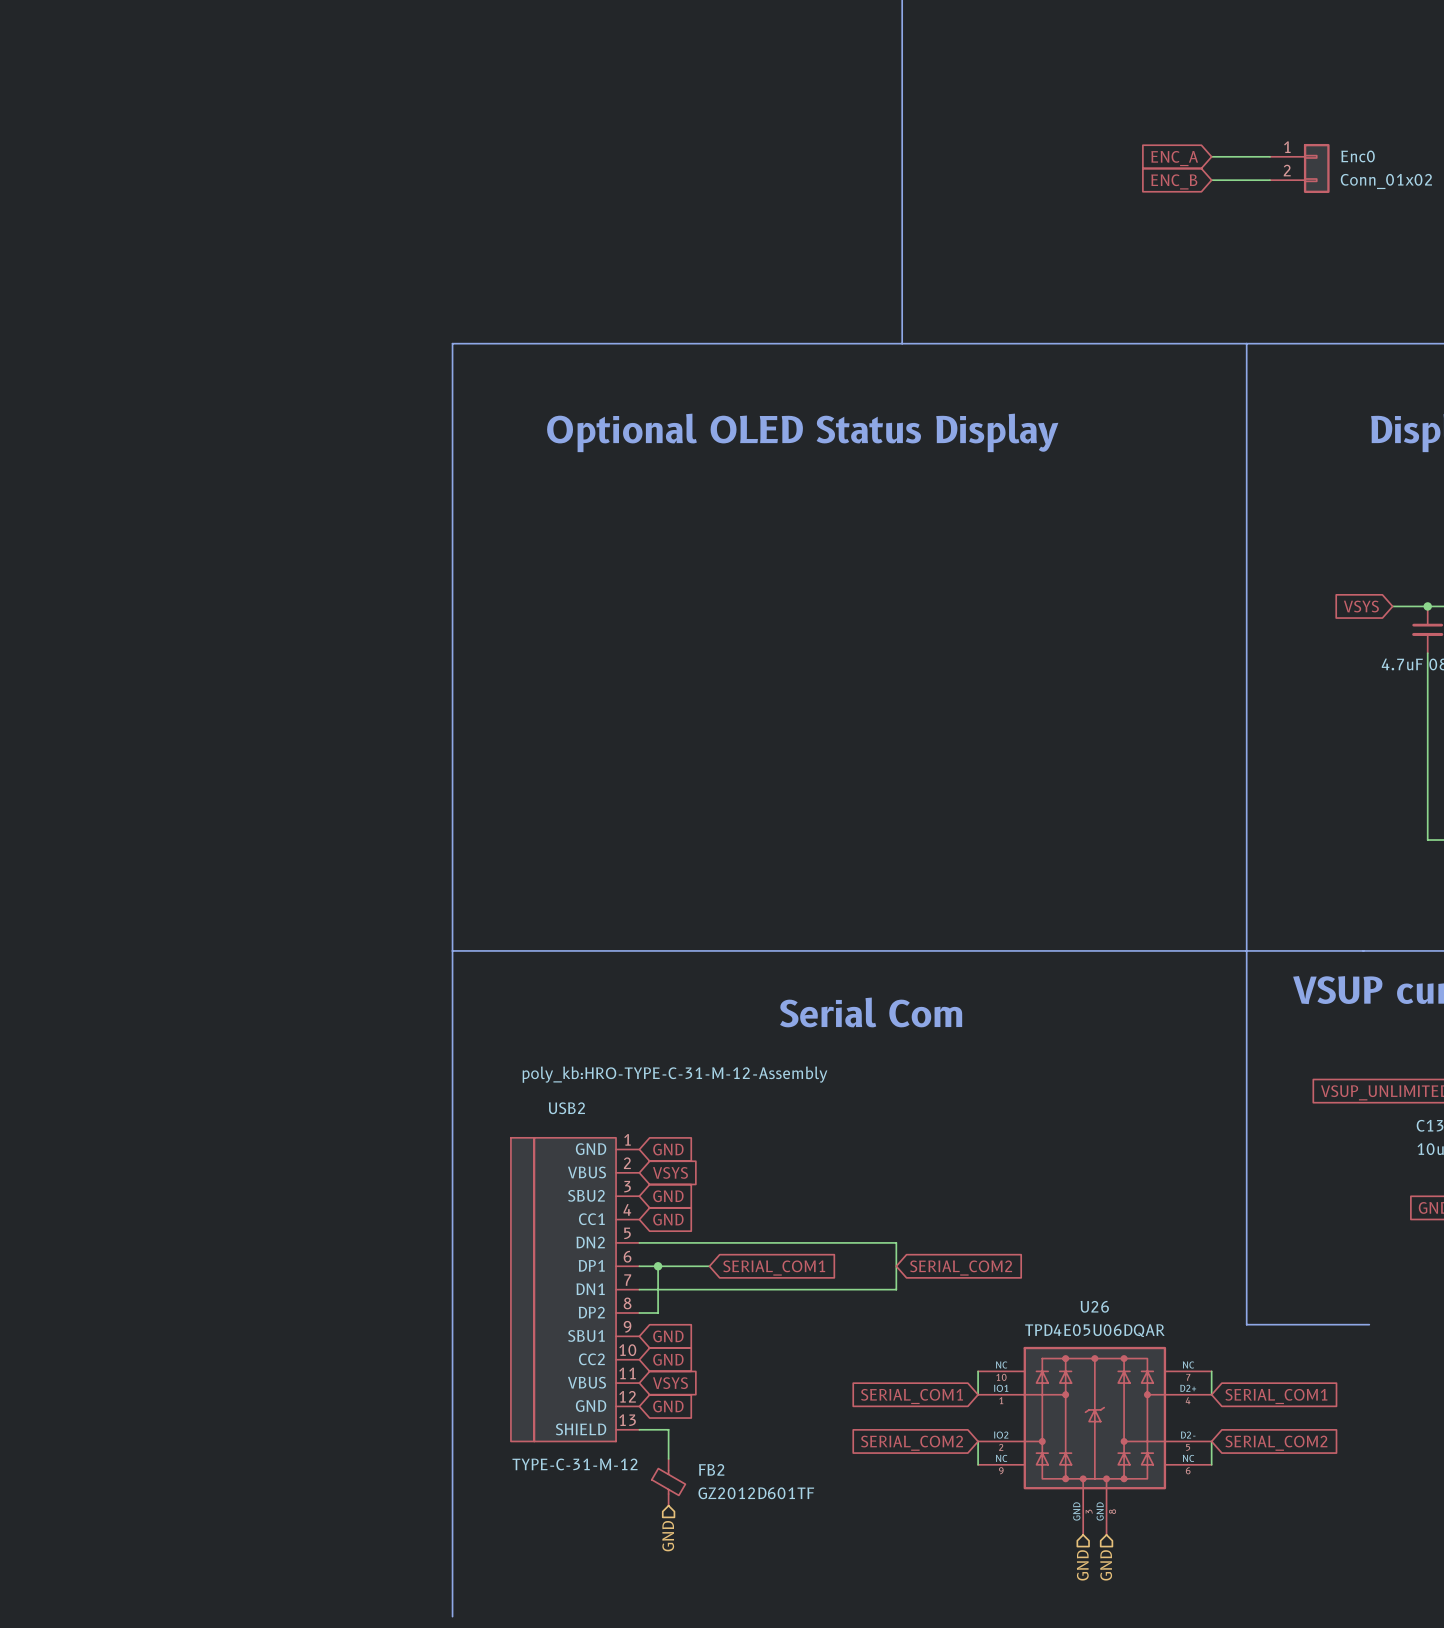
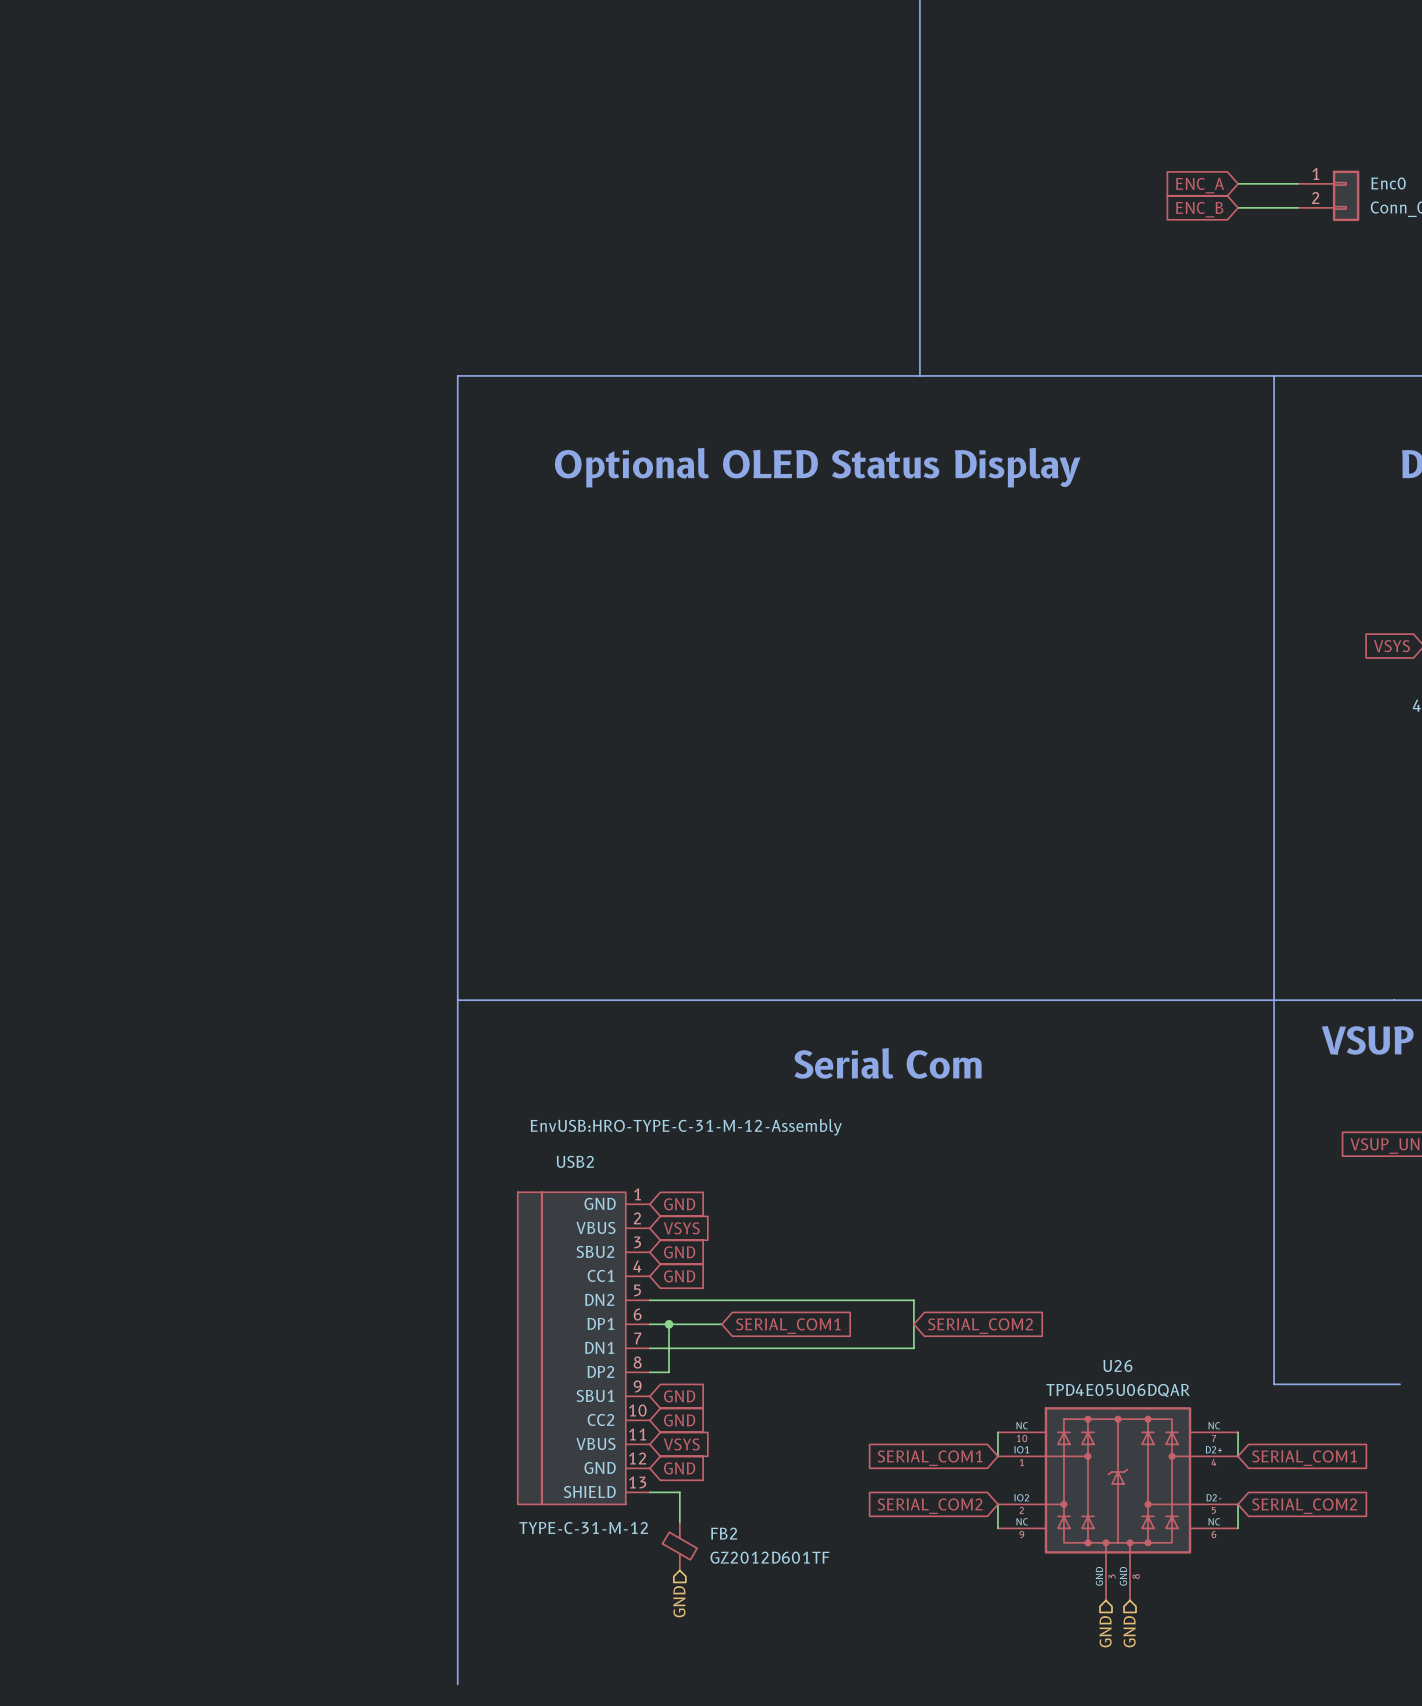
USB2 text: poly_kb:HRO-TYPE-C-31-M-12-Assembly (675, 1074) -> EnvUSB:HRO-TYPE-C-31-M-12-Assembly (686, 1127)

